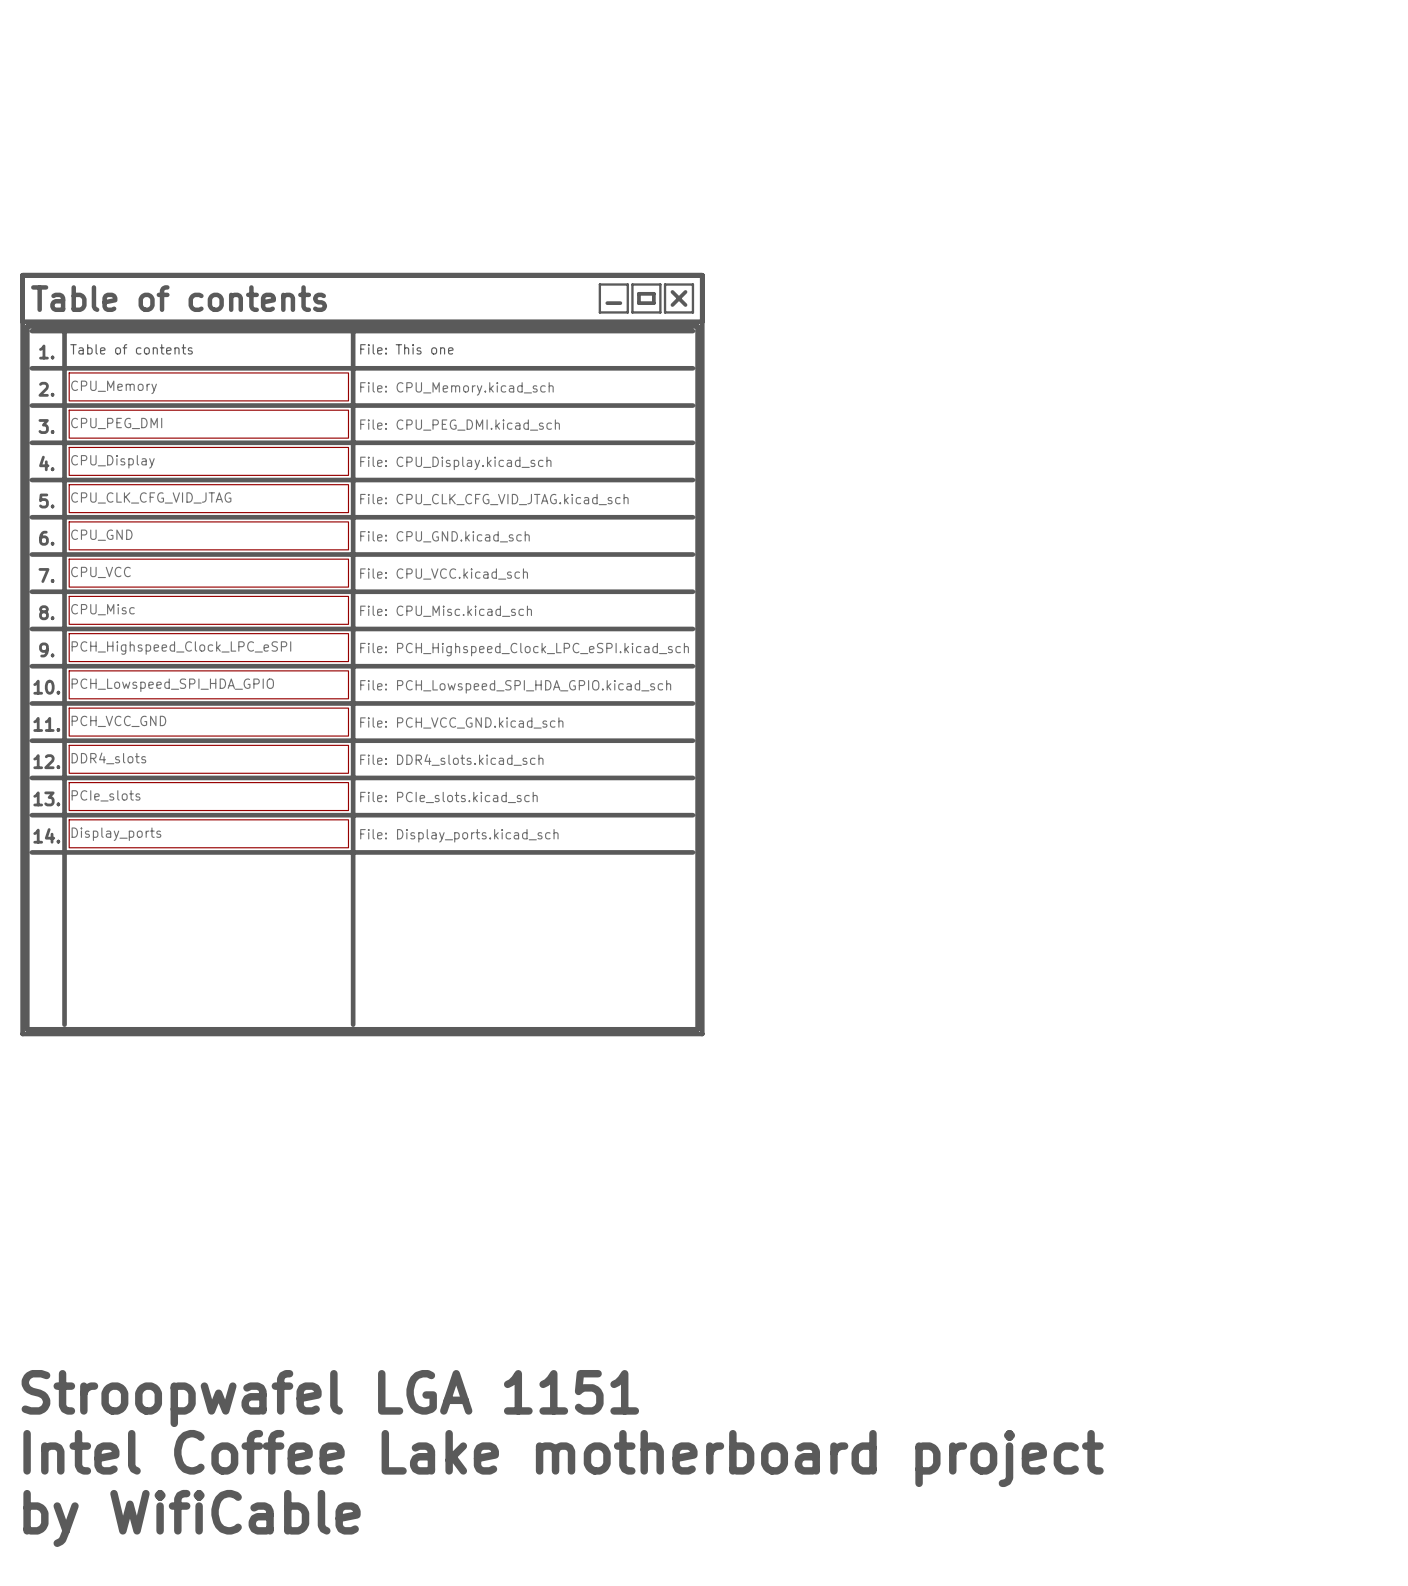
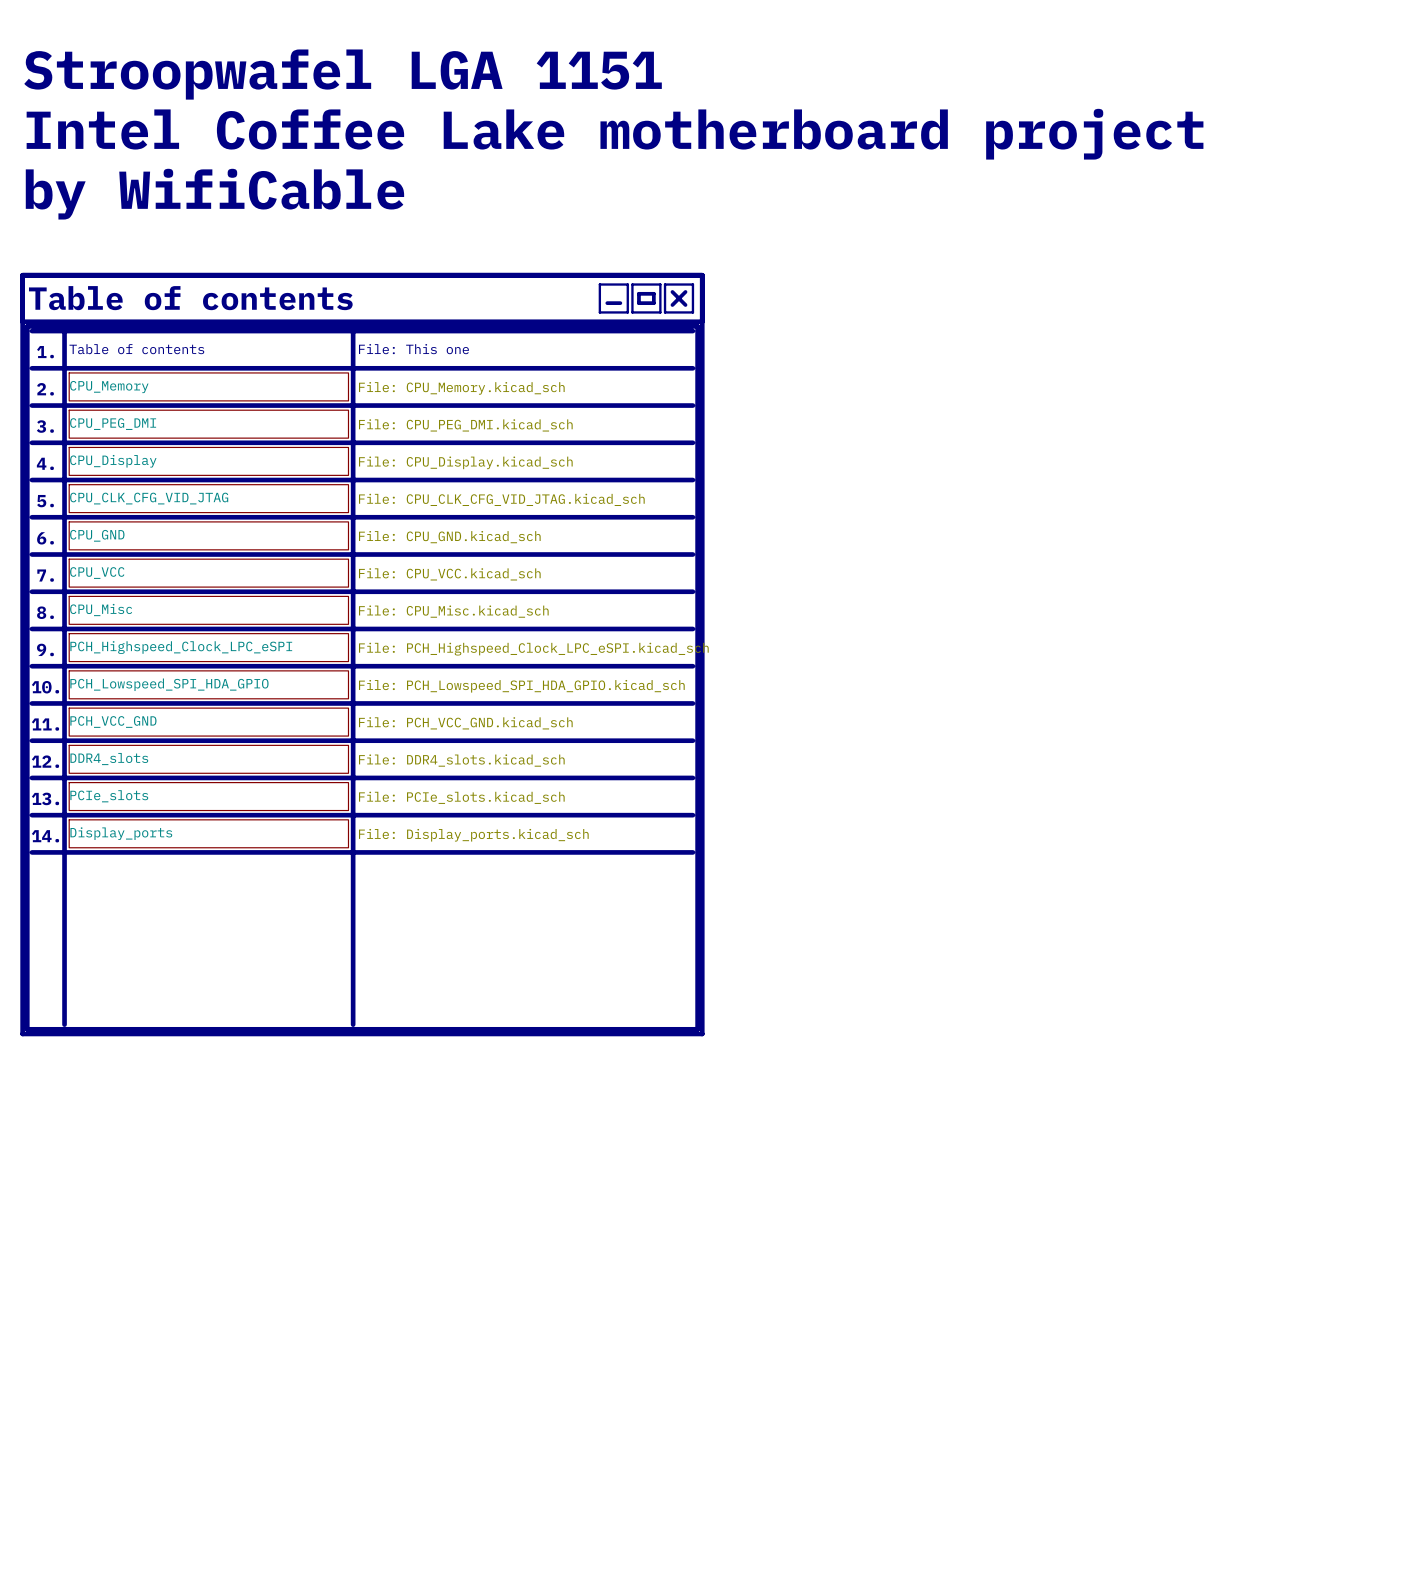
text: none -> Stroopwafel LGA 1151 (343, 74)
text: none -> Intel Coffee Lake motherboard project (615, 134)
text: none -> by WifiCable (214, 194)
text: Stroopwafel LGA 1151 (330, 1398) -> none
text: Intel Coffee Lake motherboard project (563, 1458) -> none
text: by WifiCable (192, 1518) -> none

